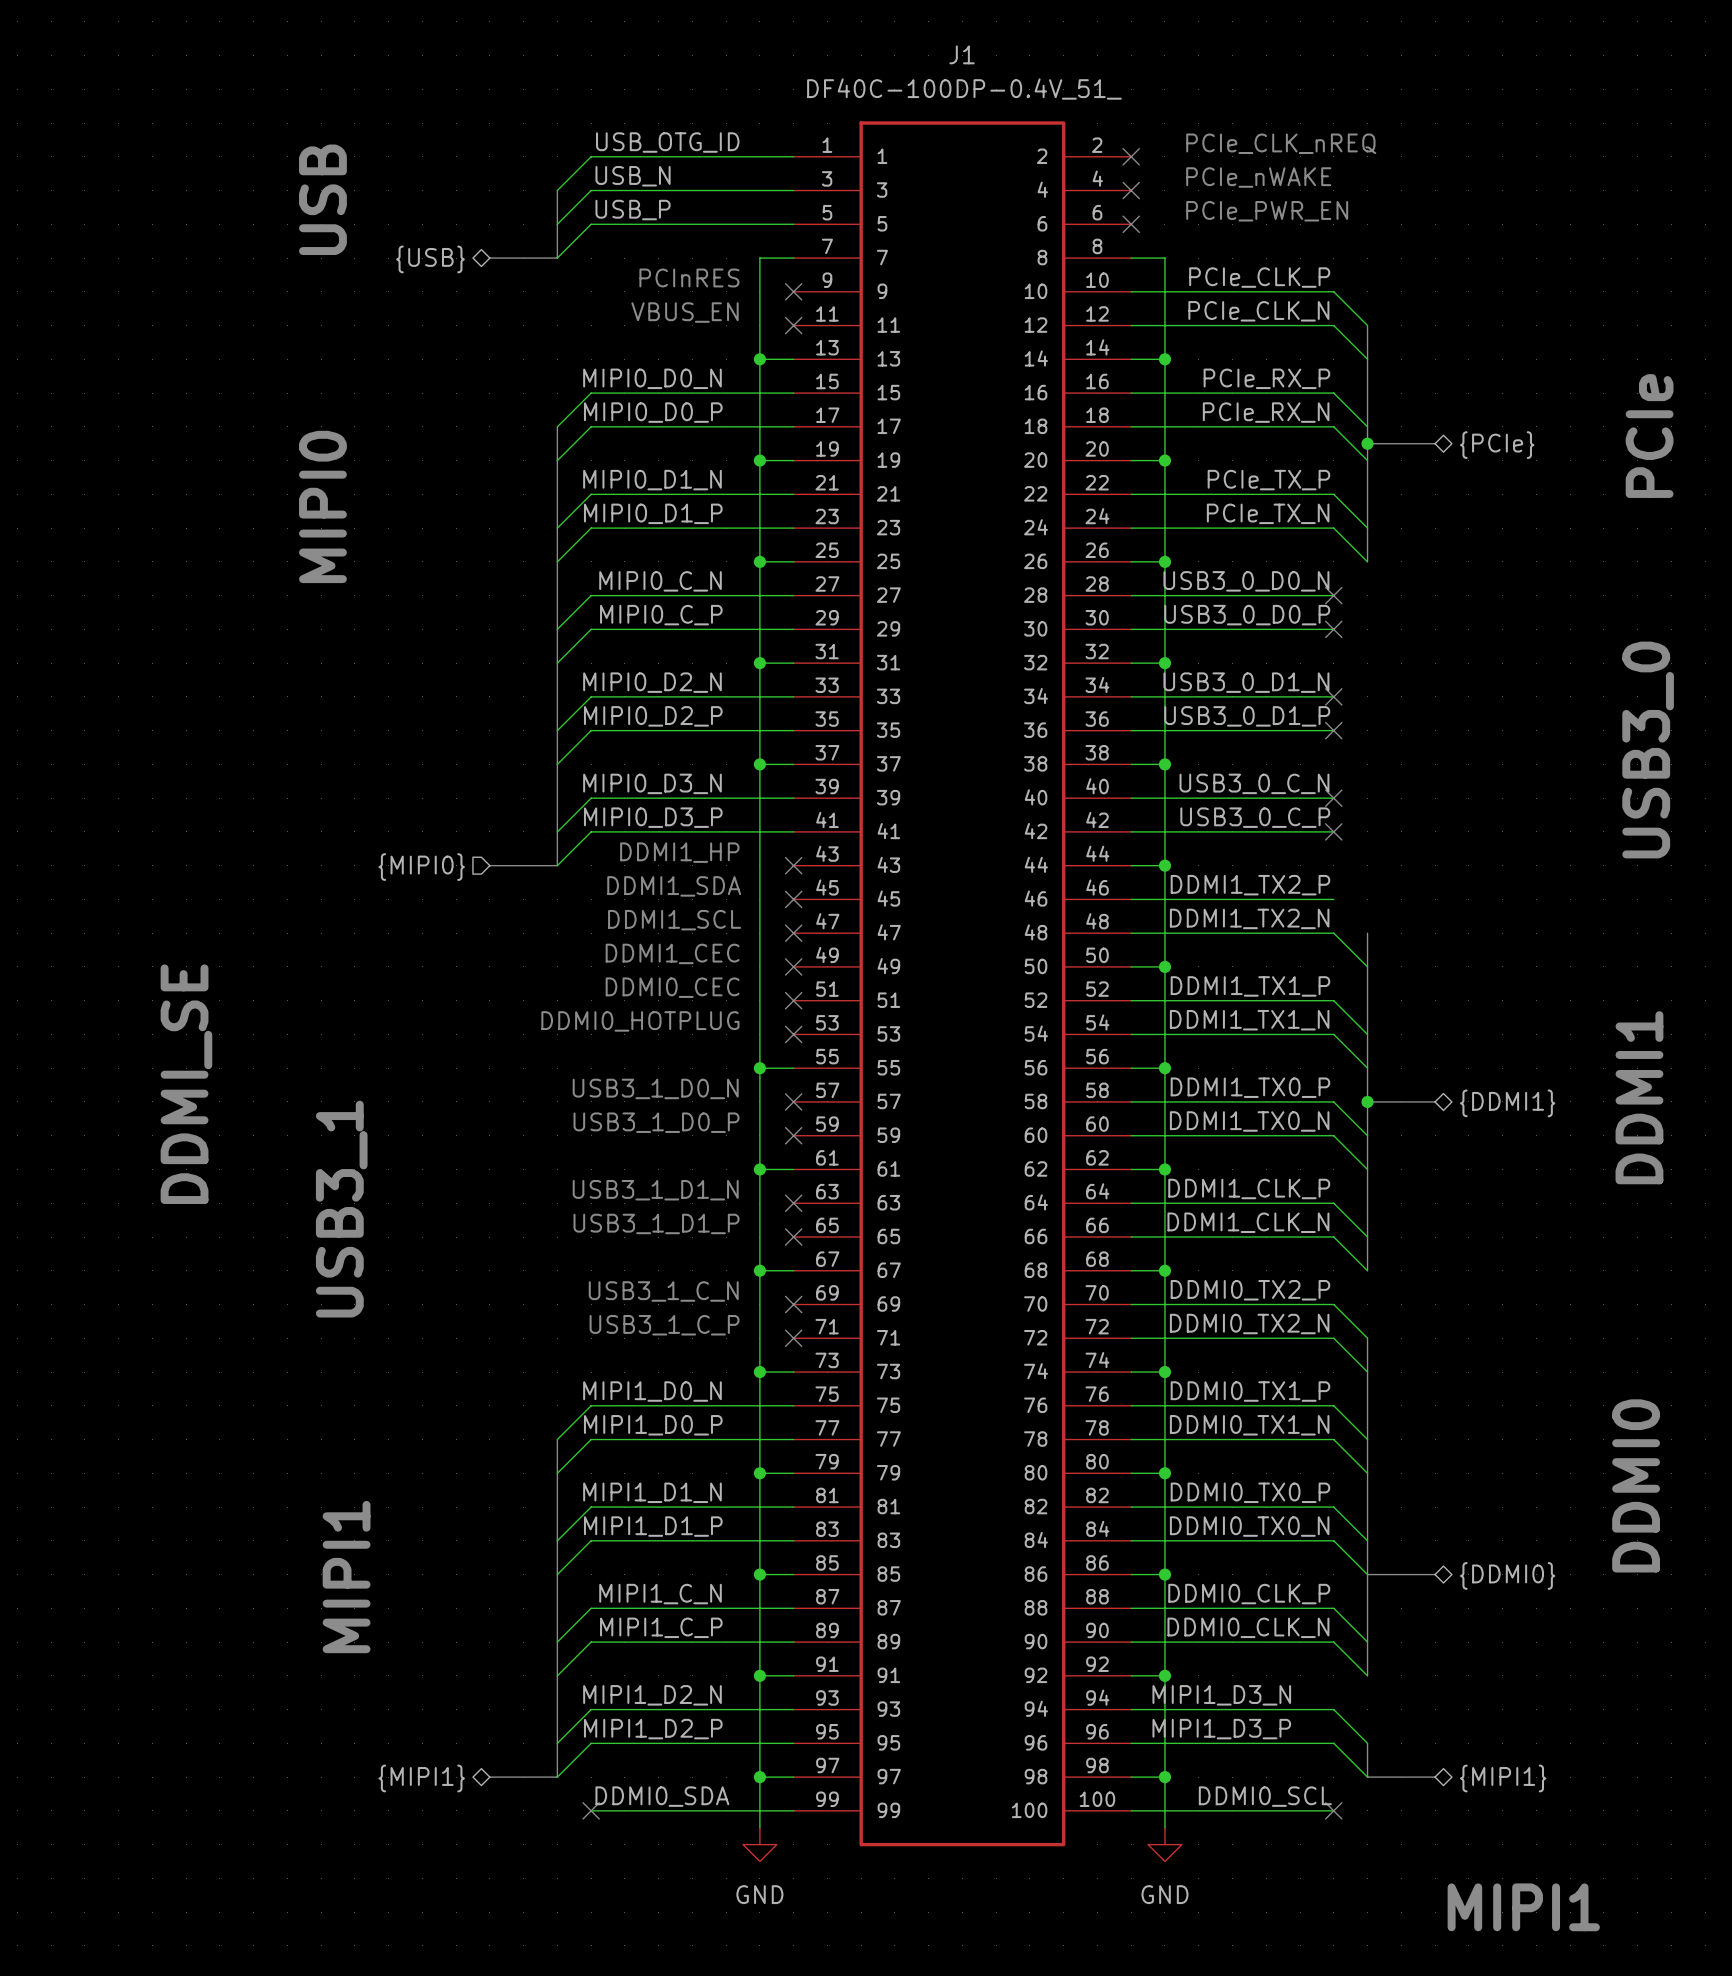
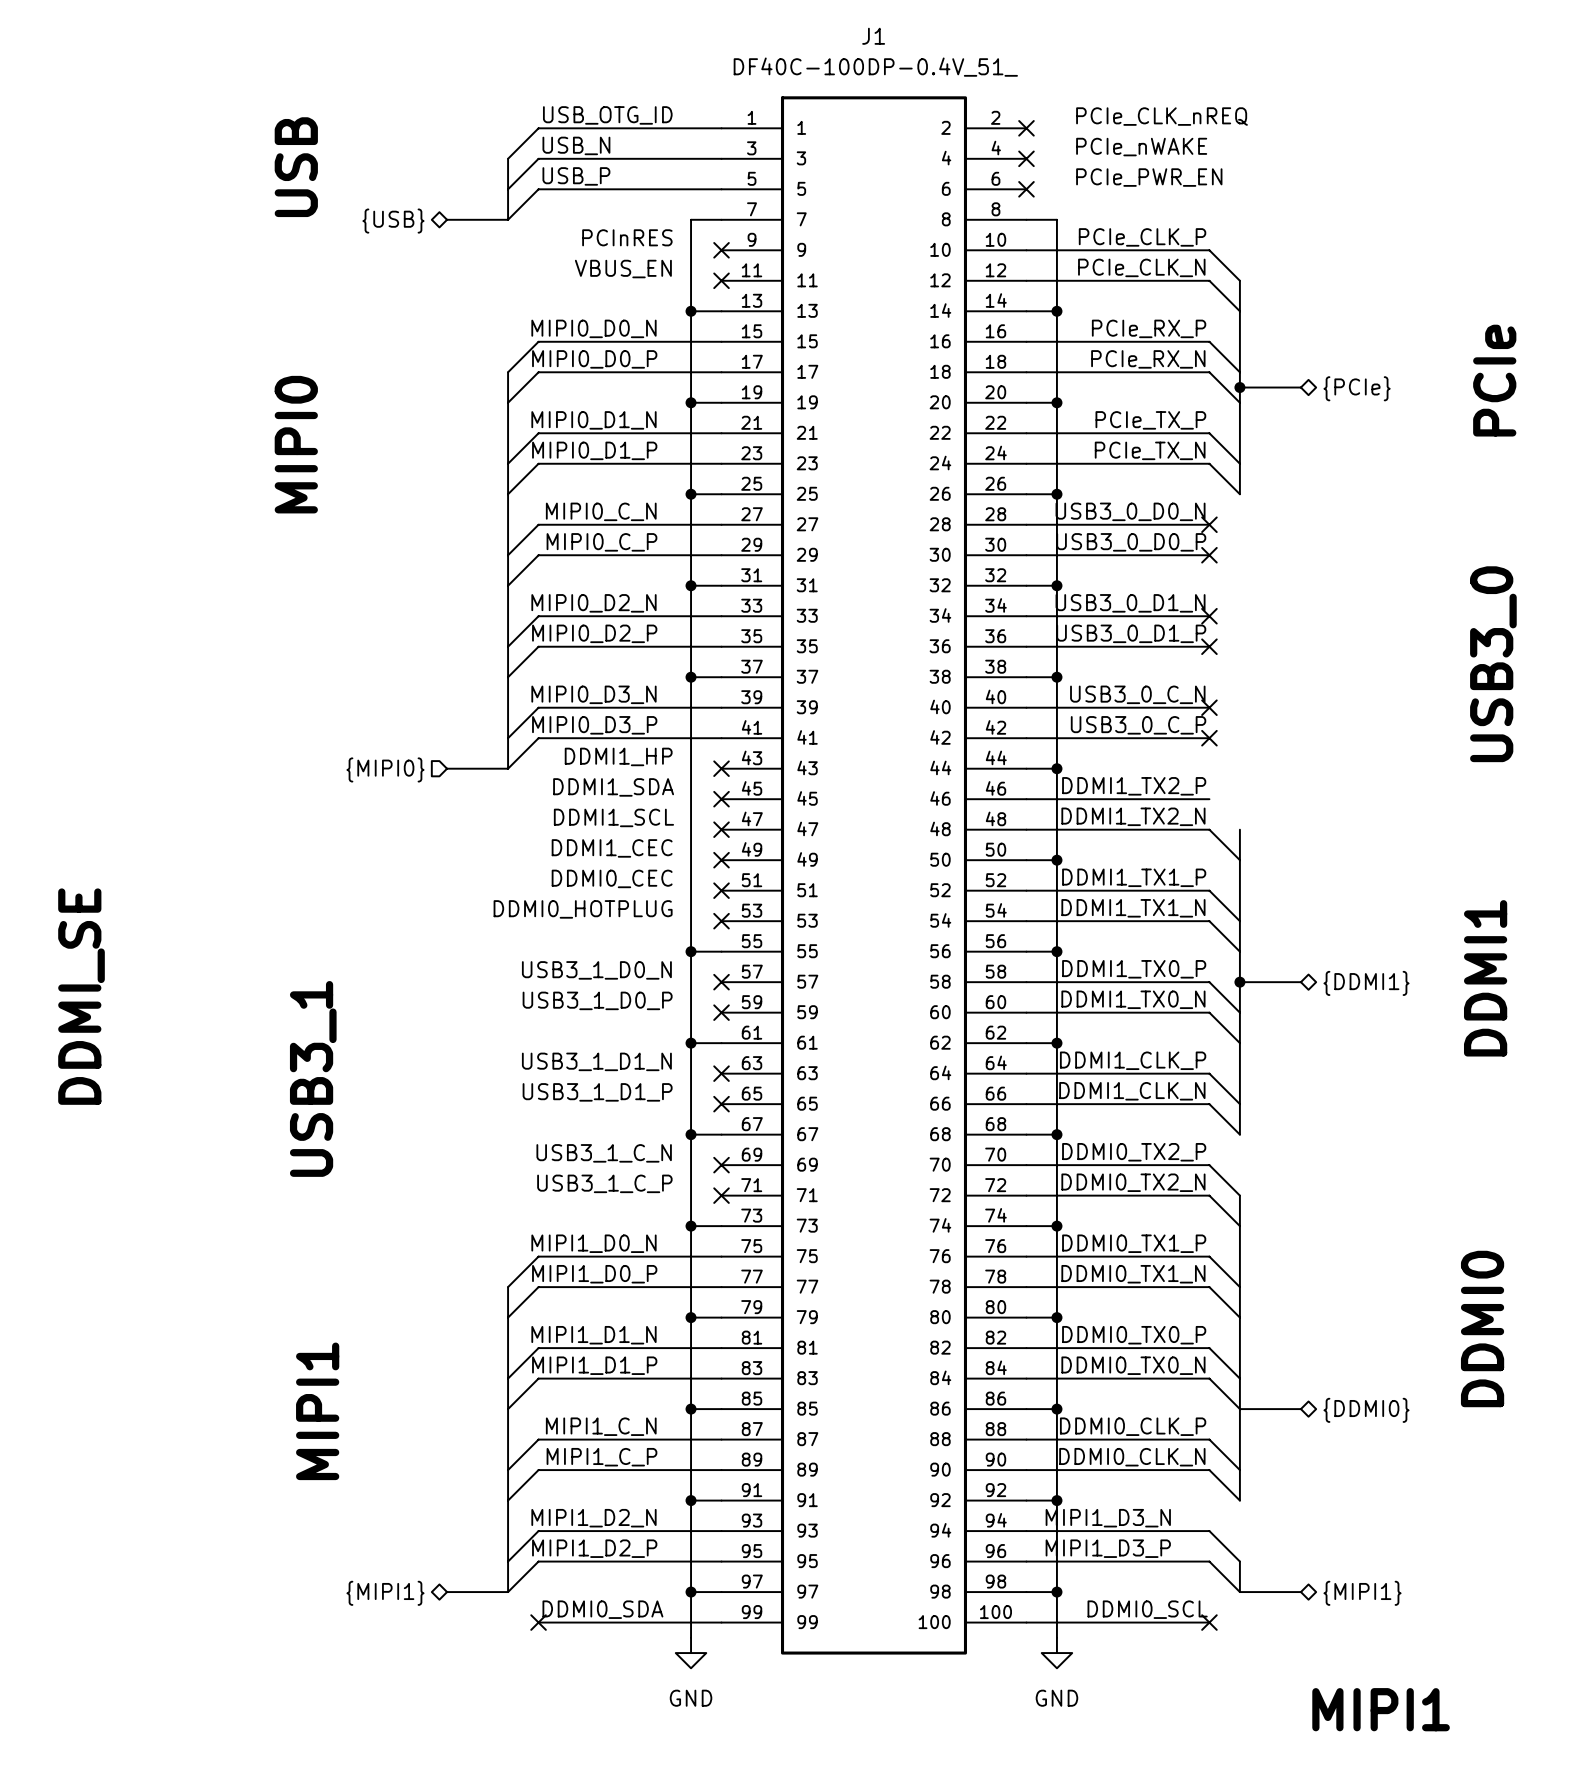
text position: DDMI_SE (186, 1084) -> DDMI_SE (81, 996)

